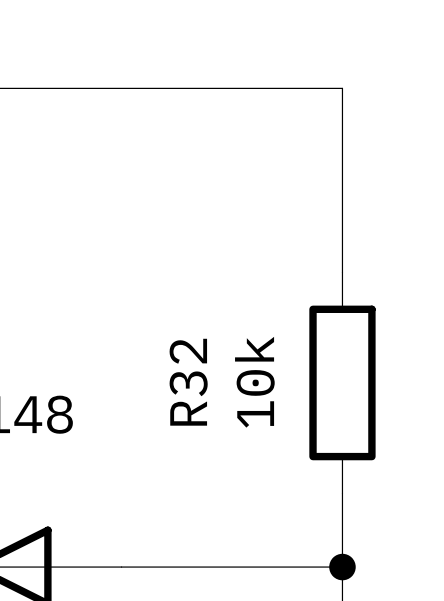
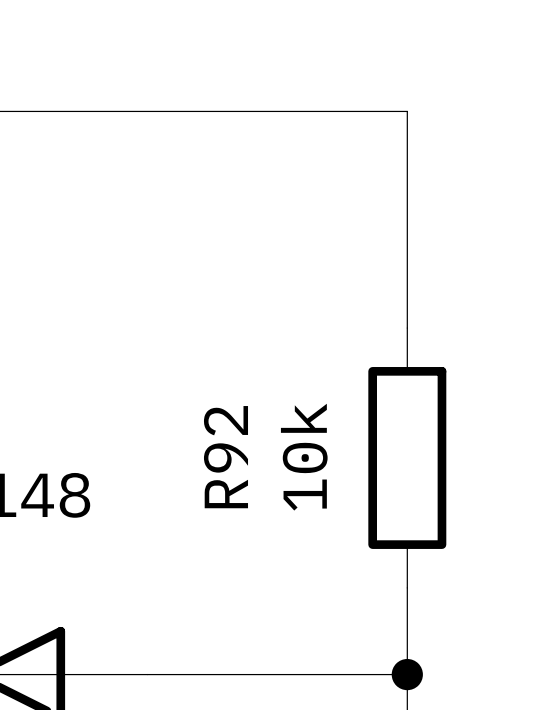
R32 name: R32 (188, 382) -> R92 (225, 457)

